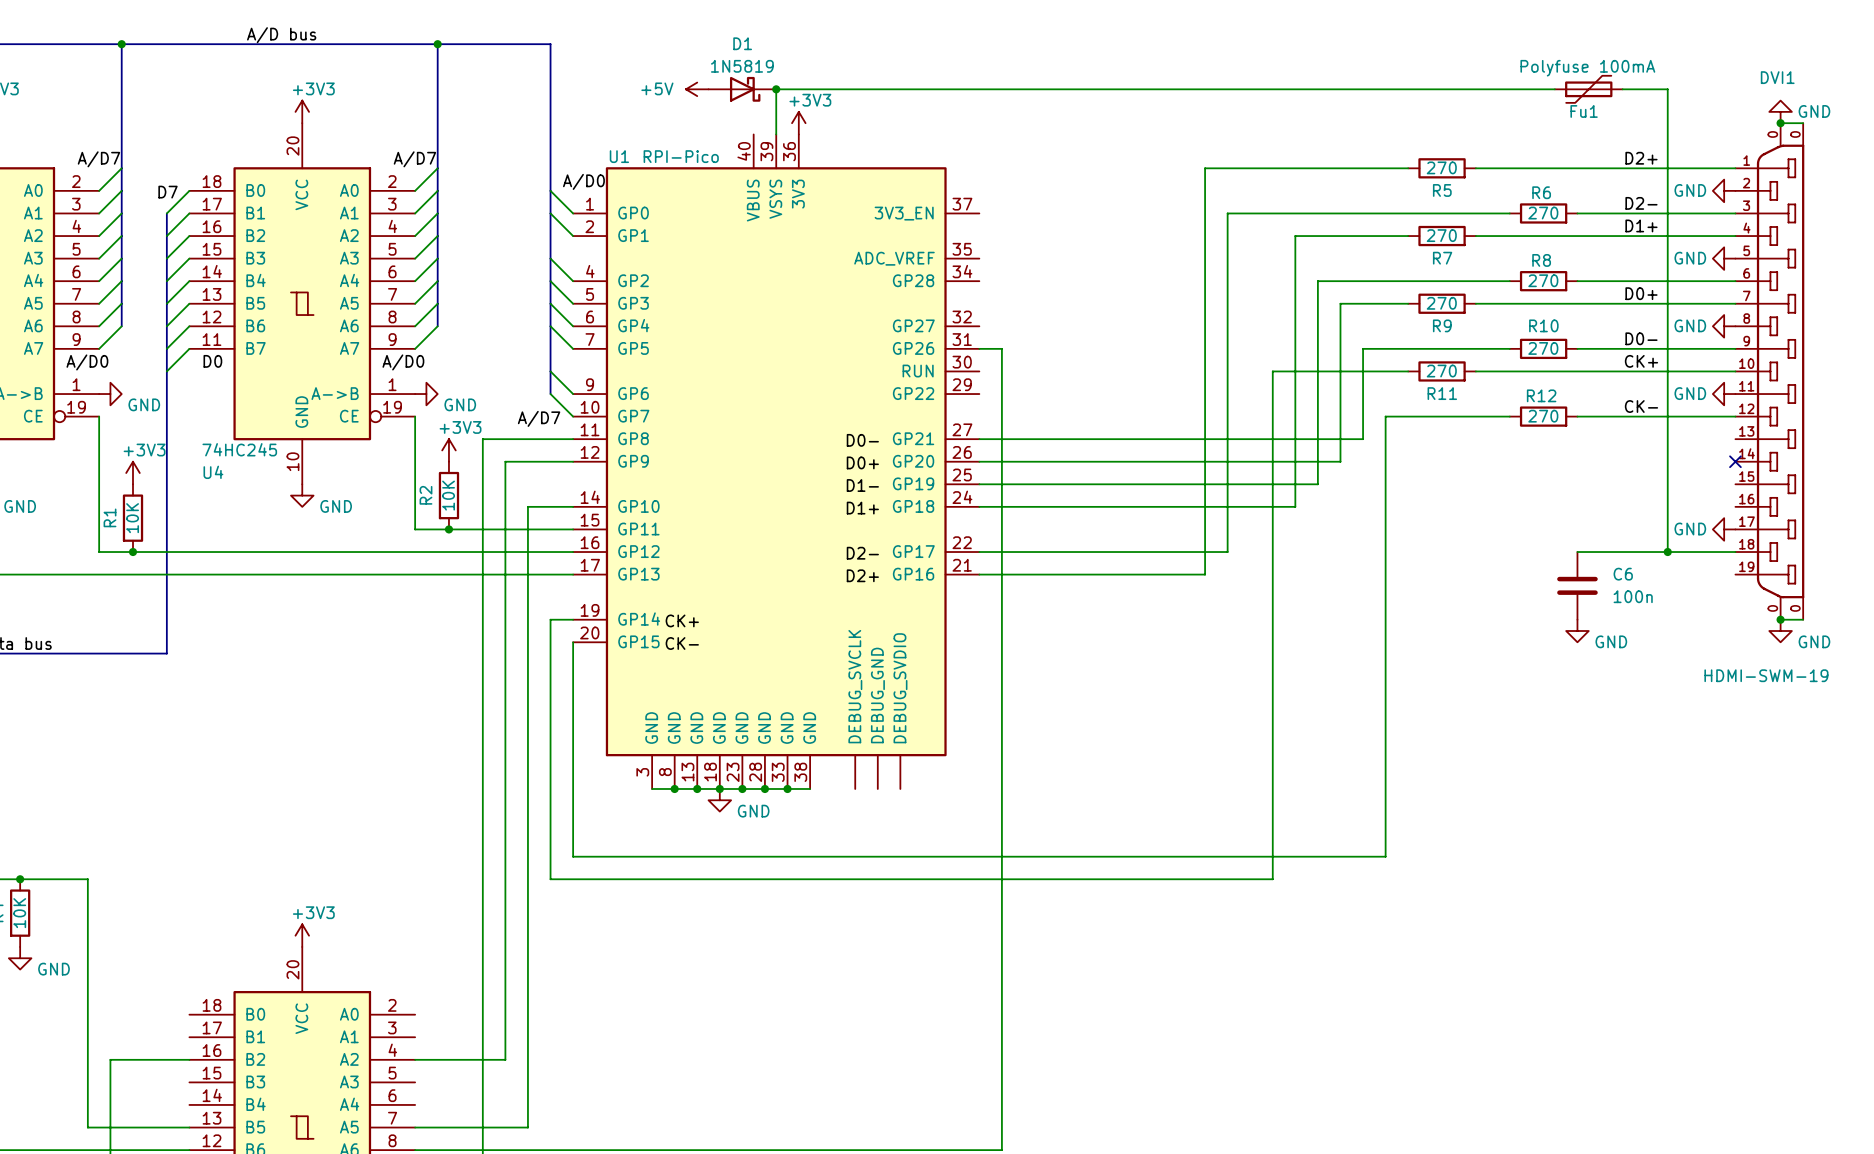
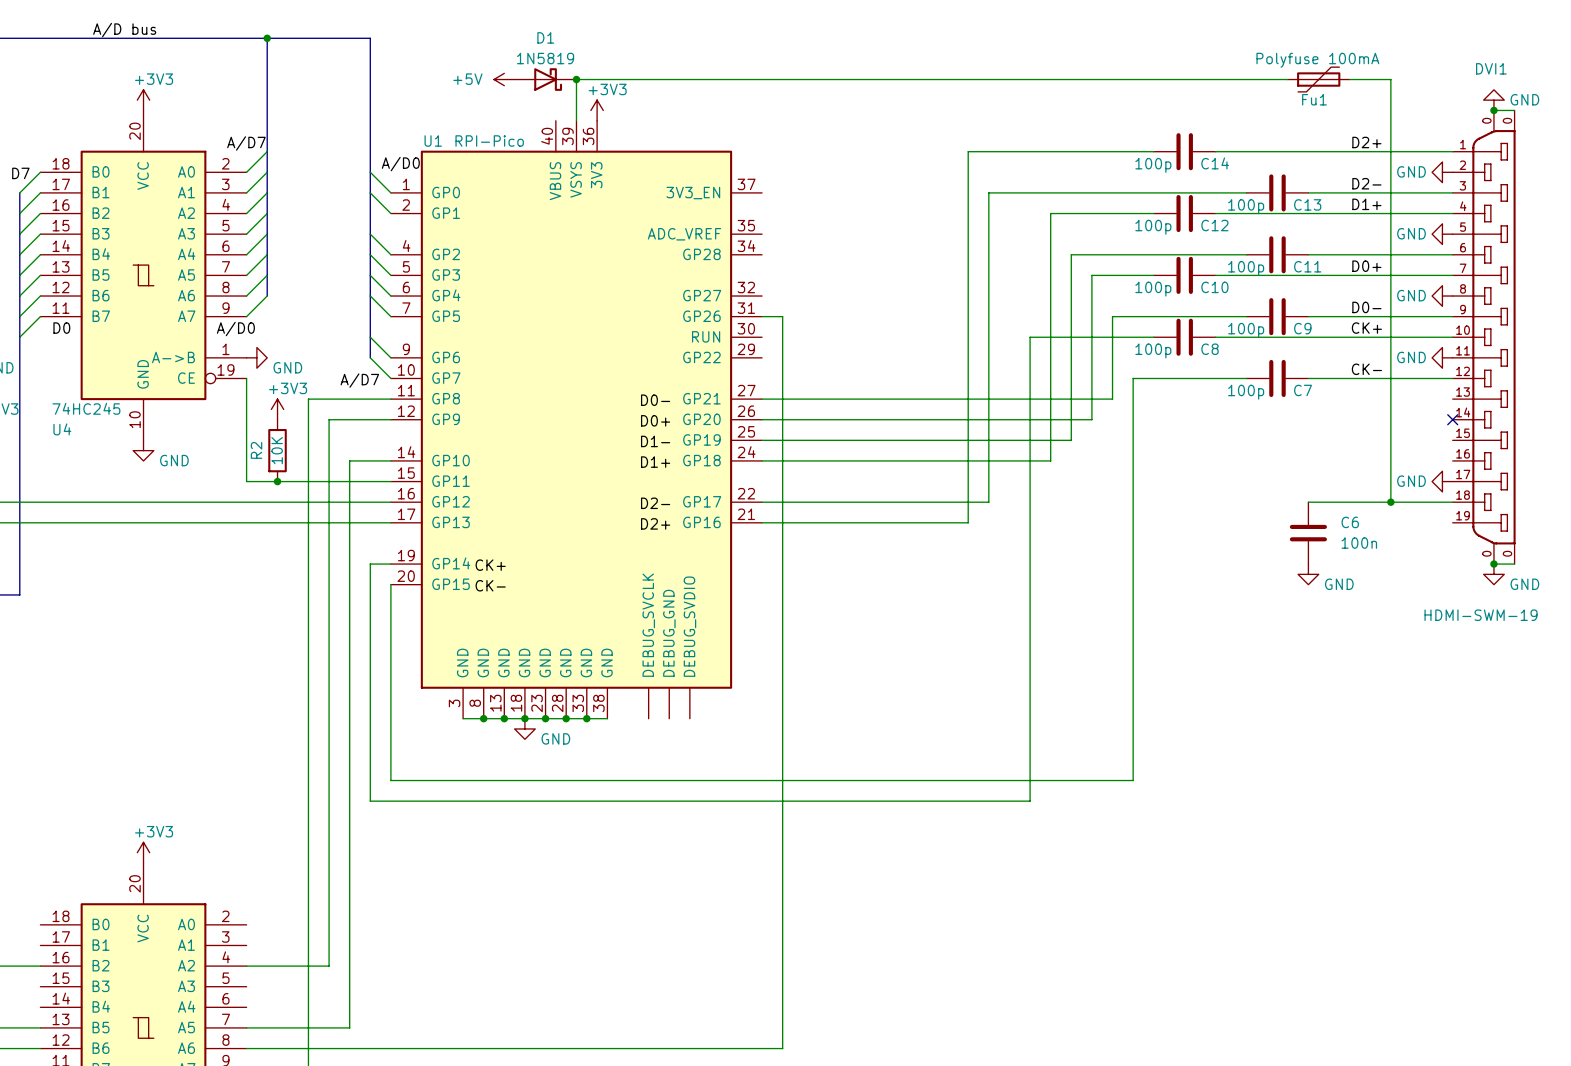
R5: 270 (1442, 168) -> none
C14: none -> 100p (1184, 151)
R6: 270 (1543, 213) -> none
C13: none -> 100p (1277, 192)
R7: 270 (1442, 236) -> none
C12: none -> 100p (1184, 213)
R8: 270 (1543, 281) -> none
C11: none -> 100p (1277, 254)
R9: 270 (1442, 303) -> none
C10: none -> 100p (1184, 275)
R10: 270 (1543, 348) -> none
C9: none -> 100p (1277, 316)
R11: 270 (1442, 371) -> none
C8: none -> 100p (1184, 337)
R12: 270 (1543, 416) -> none
C7: none -> 100p (1277, 378)

